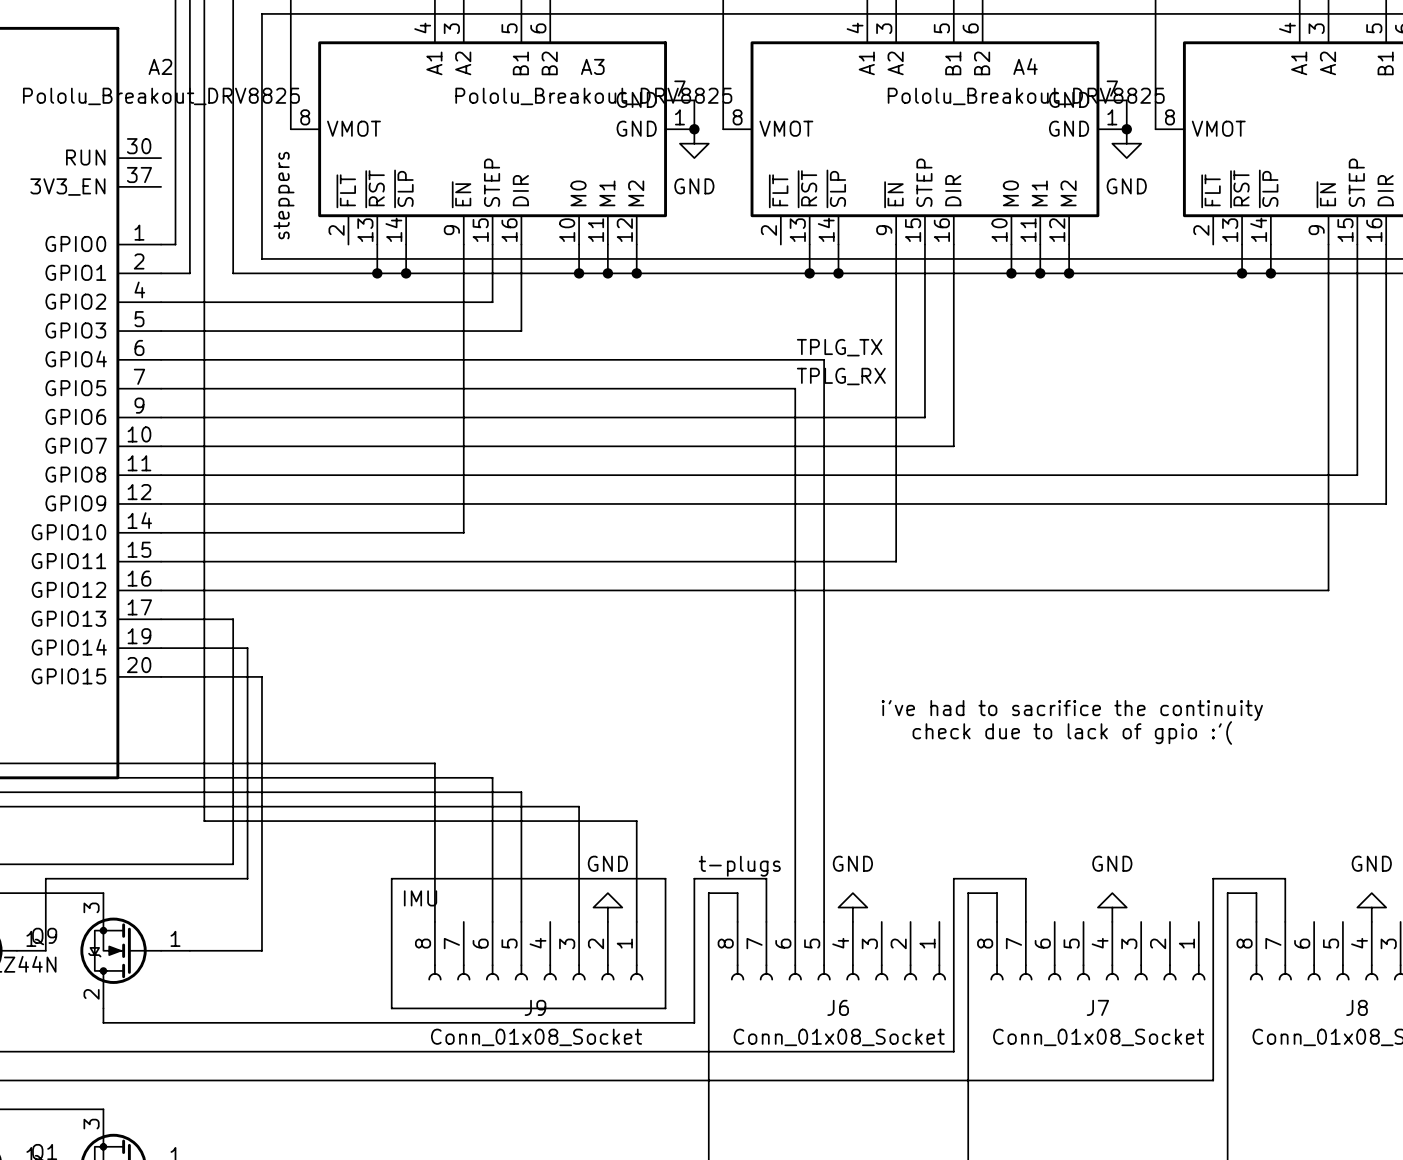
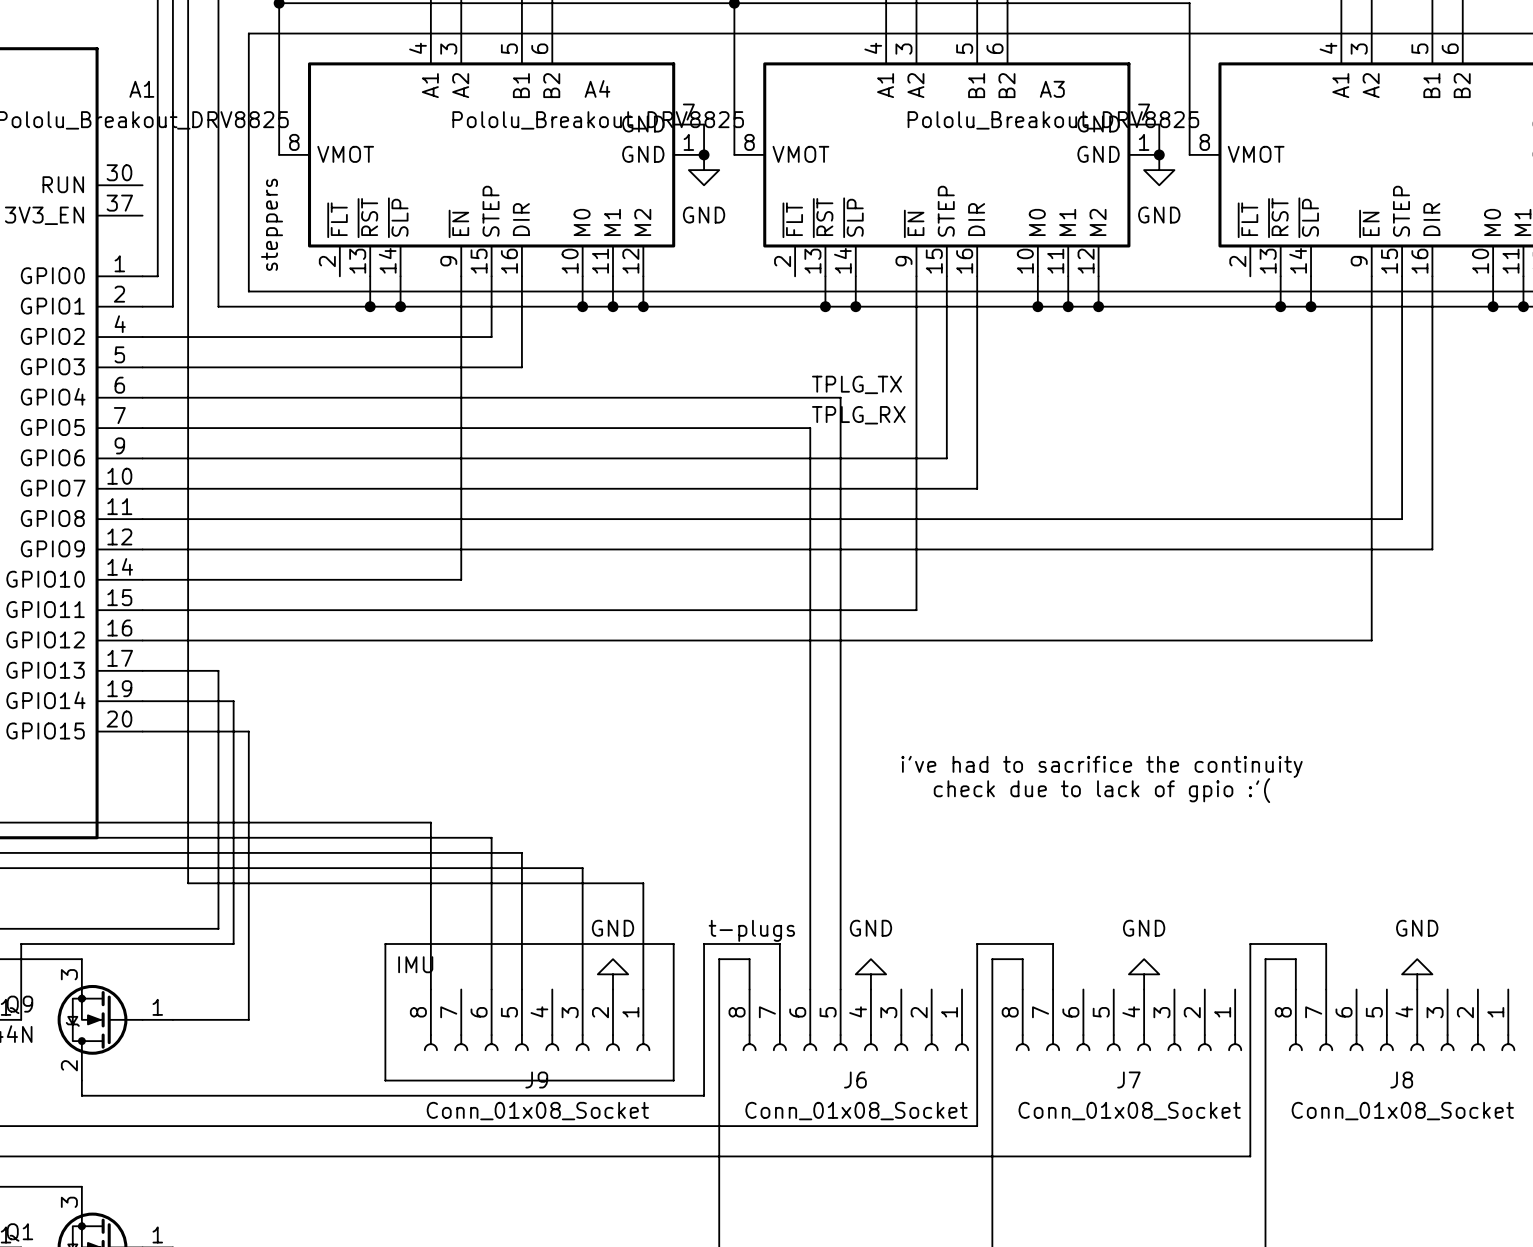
A2 name: A2 (160, 66) -> A1 (141, 89)
A3 name: A3 (592, 66) -> A4 (597, 88)
A4 name: A4 (1025, 66) -> A3 (1052, 89)

